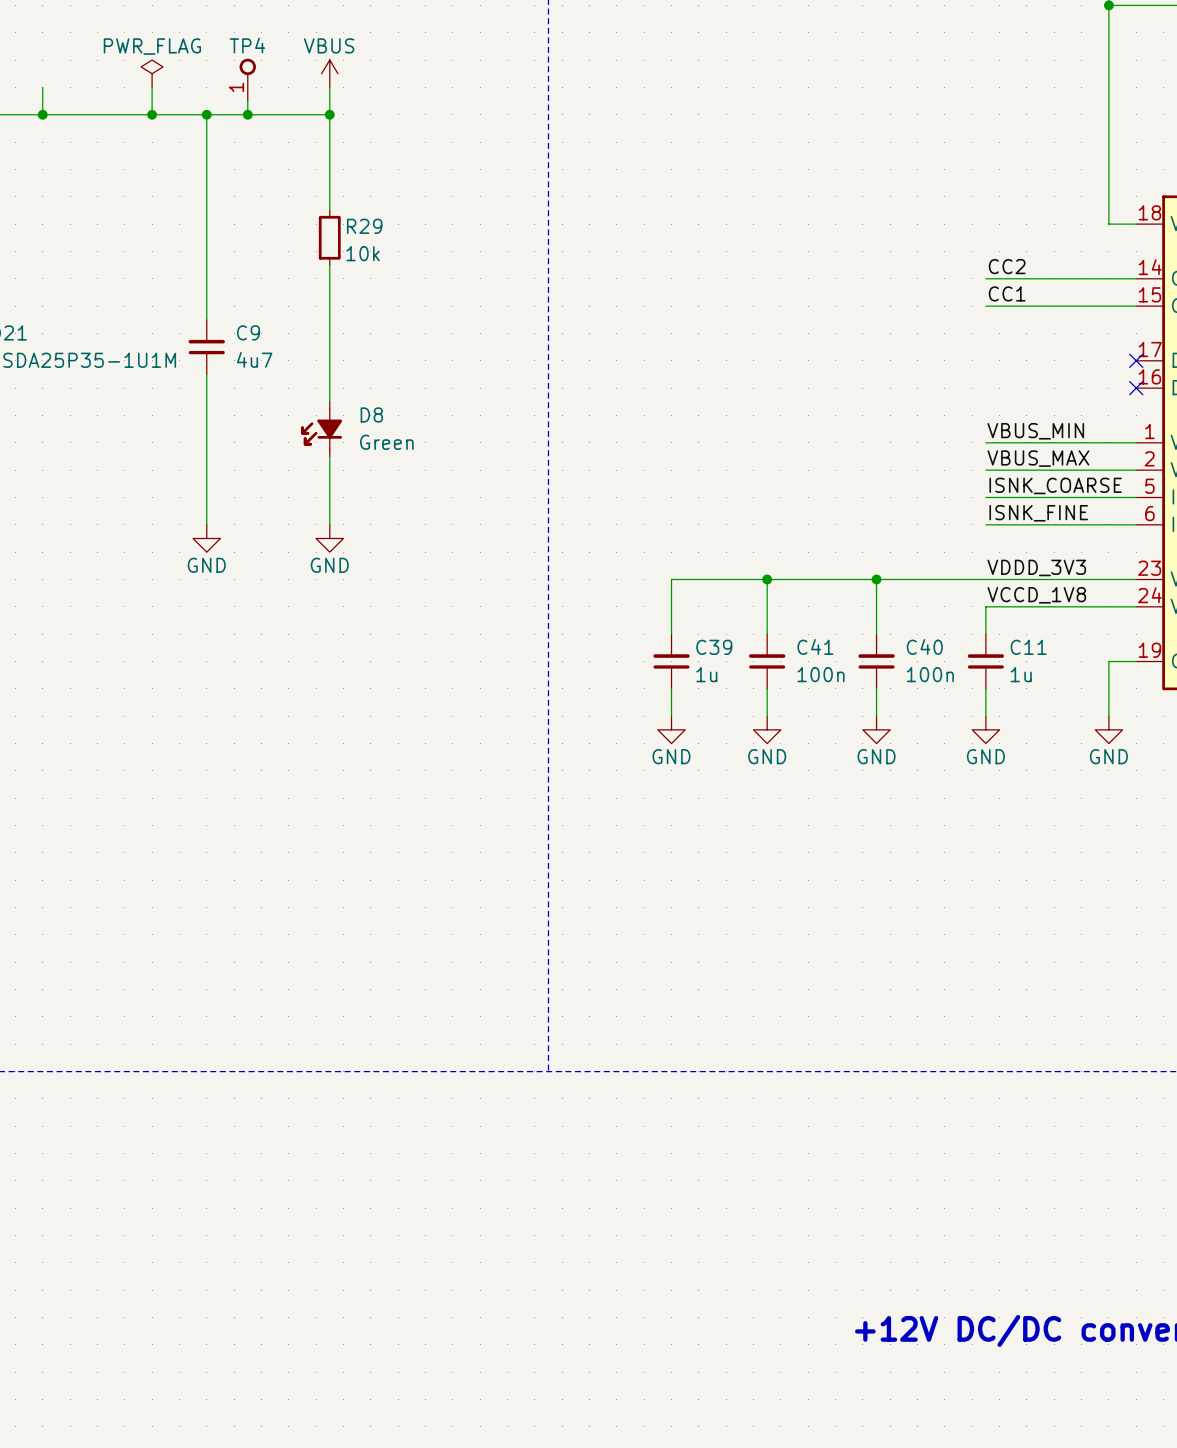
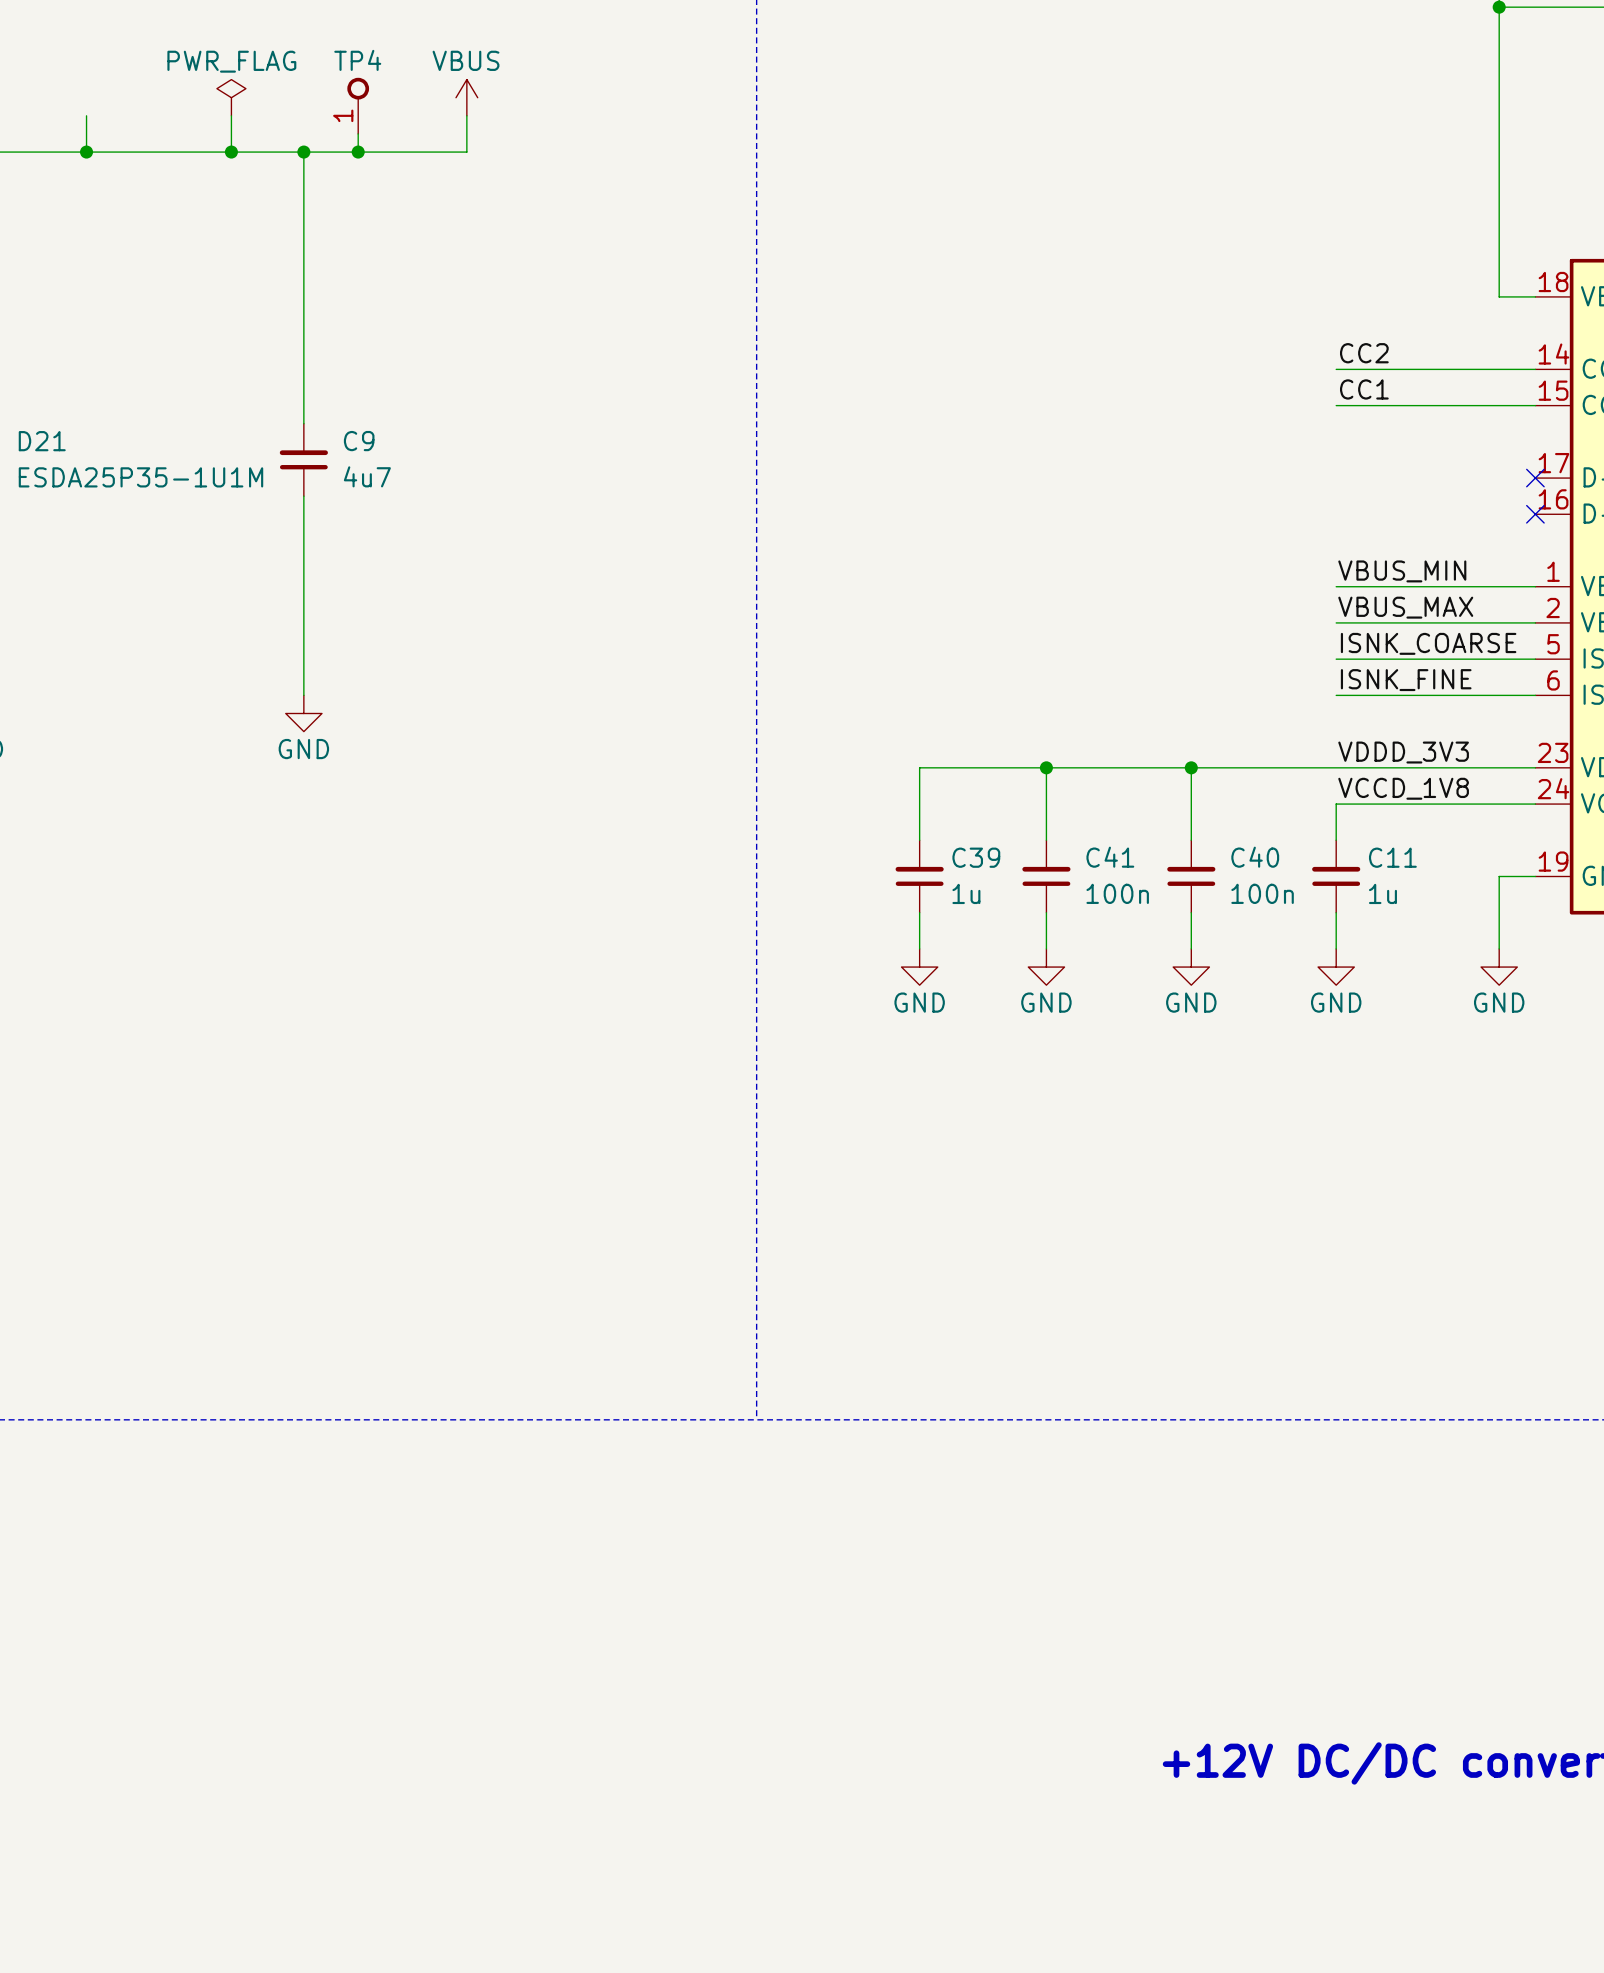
wire: (329, 114) (329, 210) -> none
junction: (329, 114) -> none
R29: (329, 237) -> none
wire: (329, 265) (329, 401) -> none
D8: (321, 429) -> none
wire: (329, 456) (329, 524) -> none
power symbol: GND (329, 538) -> none

